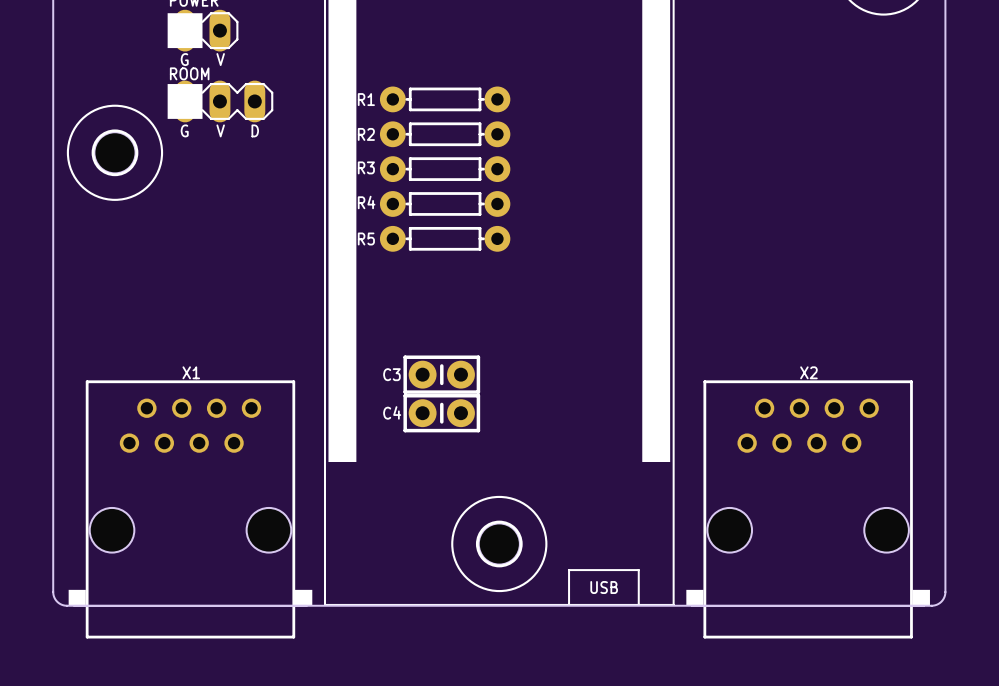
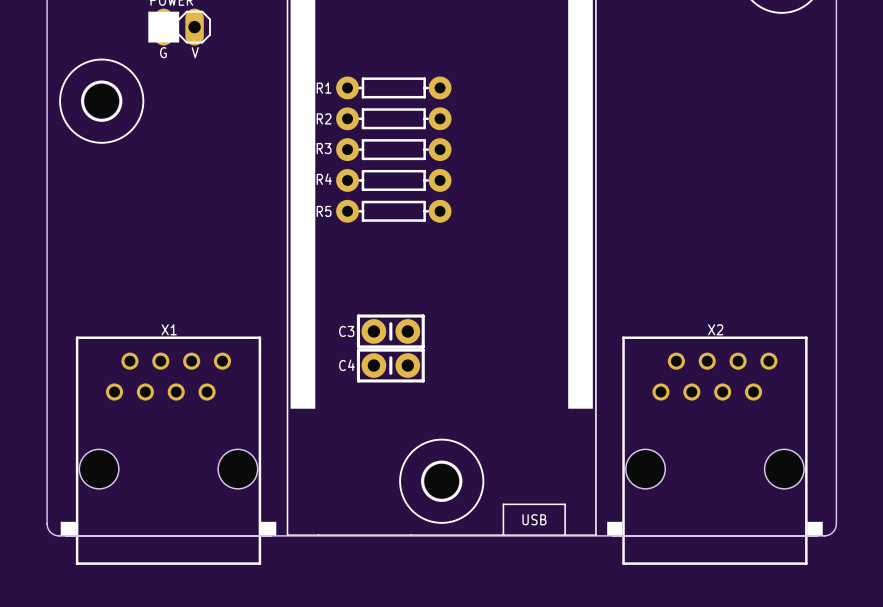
ROOM: (220, 101) -> none
text: G (184, 130) -> none
text: V (220, 130) -> none
text: D (255, 130) -> none
part position: (114, 152) -> (101, 101)

